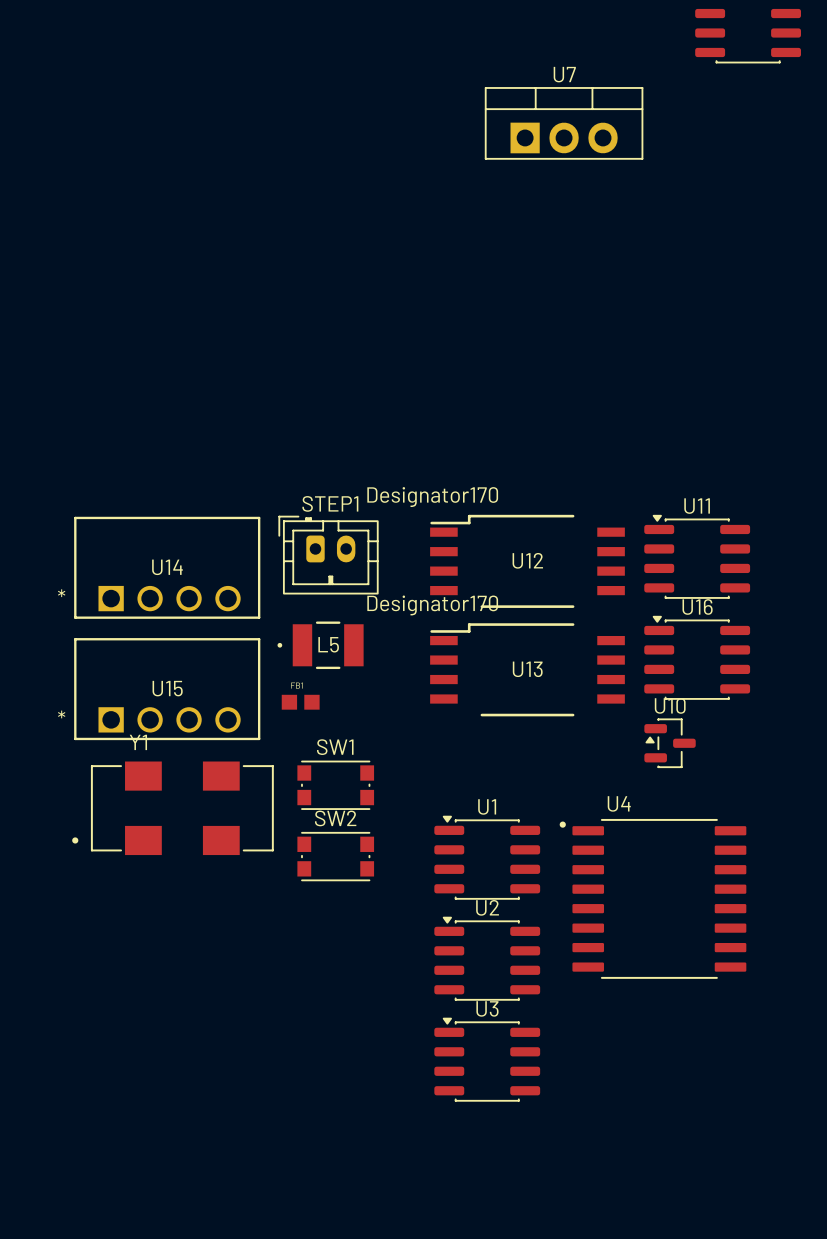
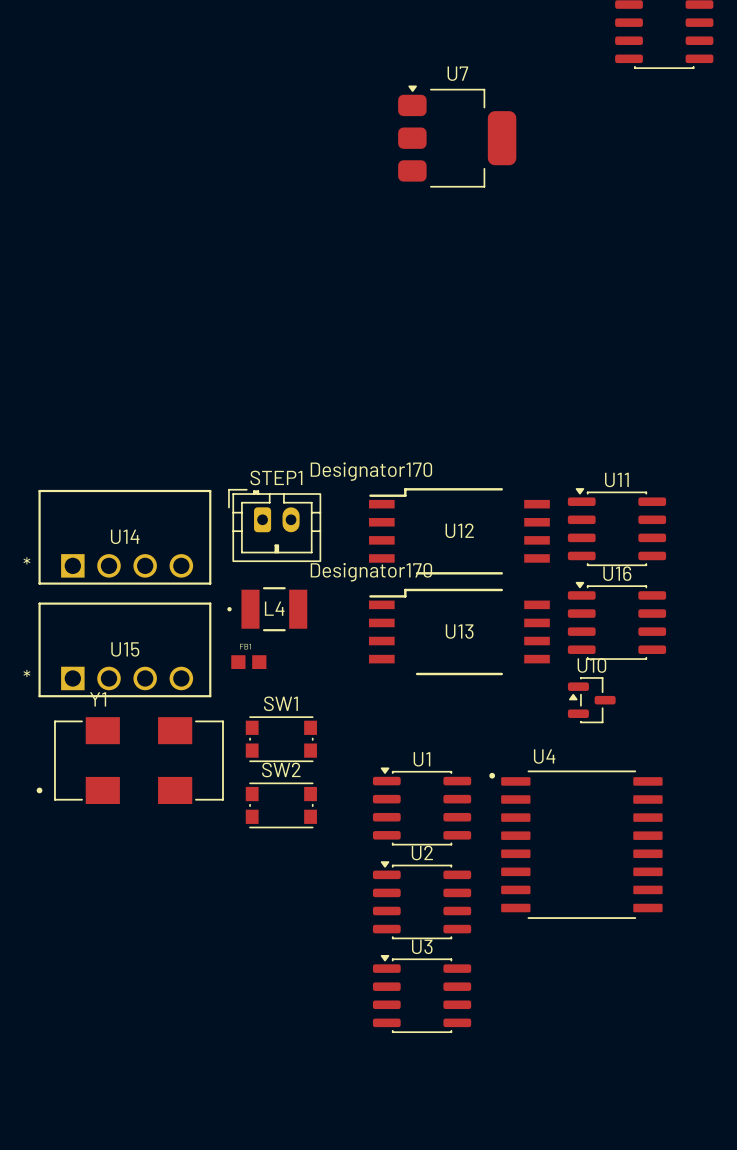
U7 footprint: [484, 87, 644, 160] -> [398, 85, 517, 188]
L5 name: L5 (328, 644) -> L4 (274, 608)

